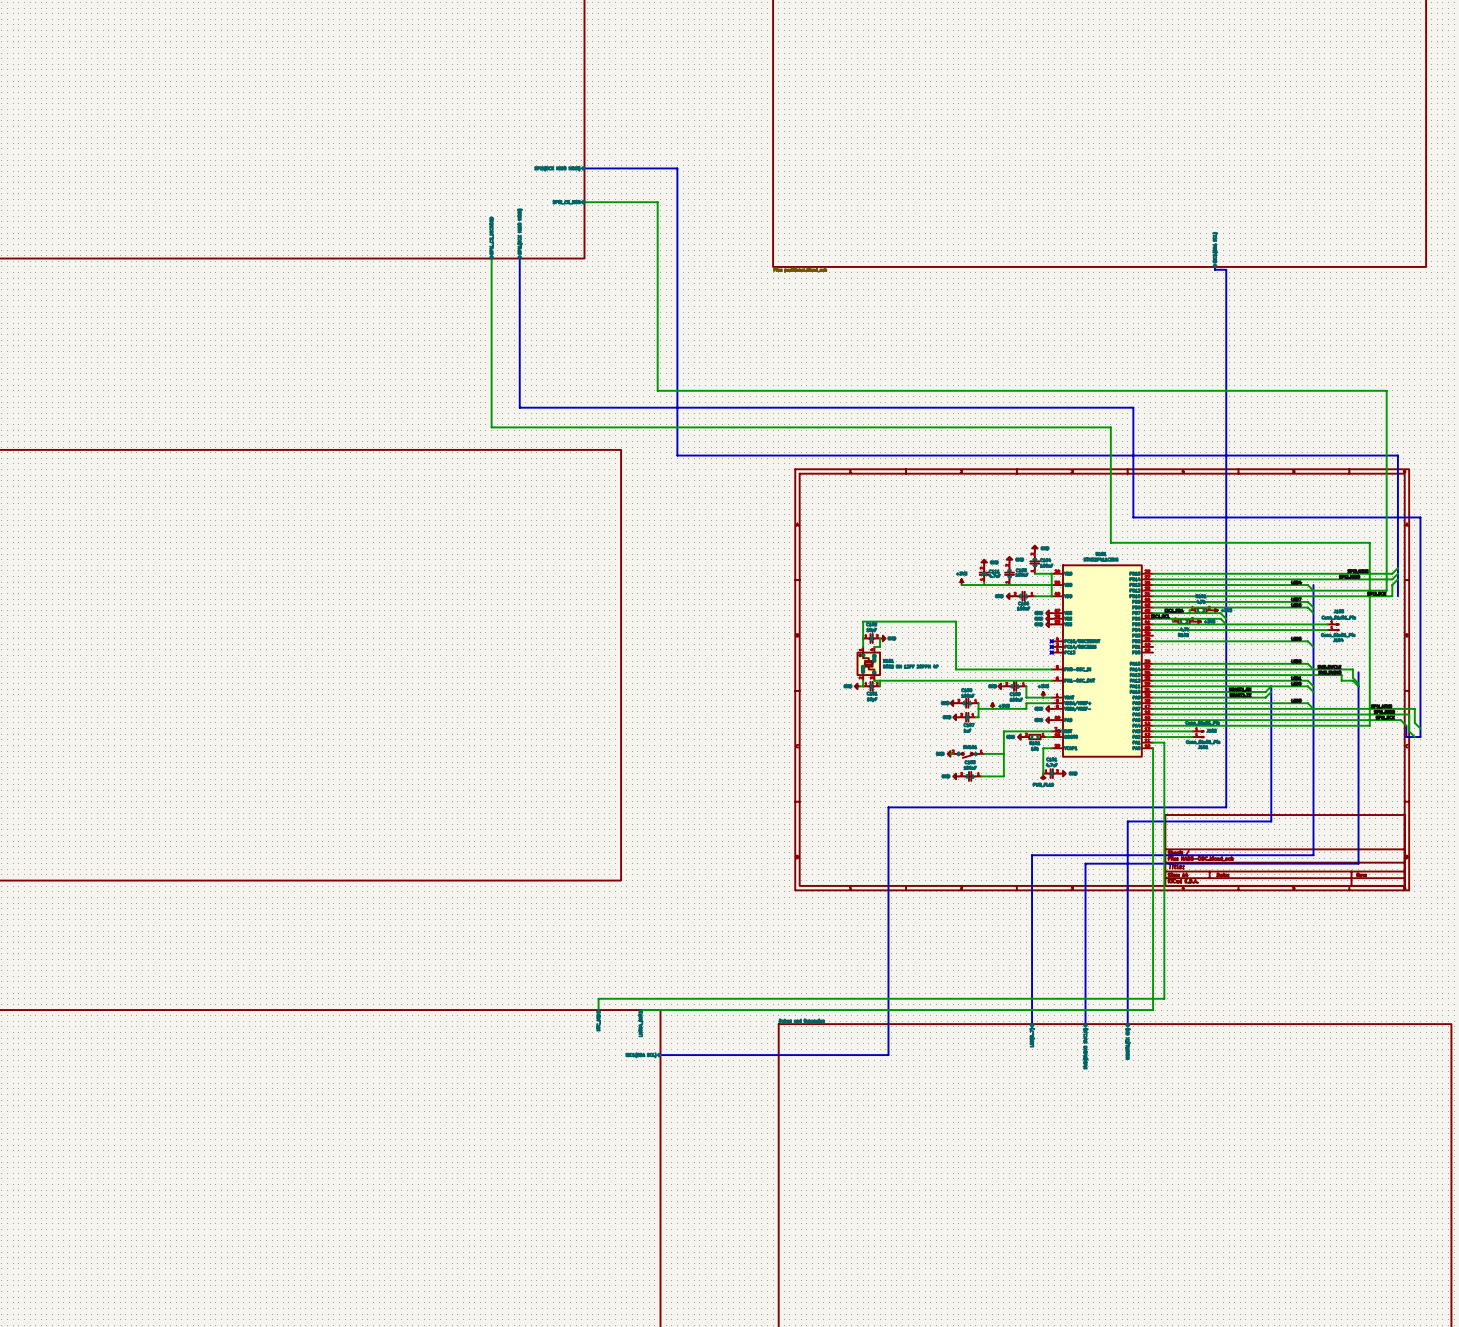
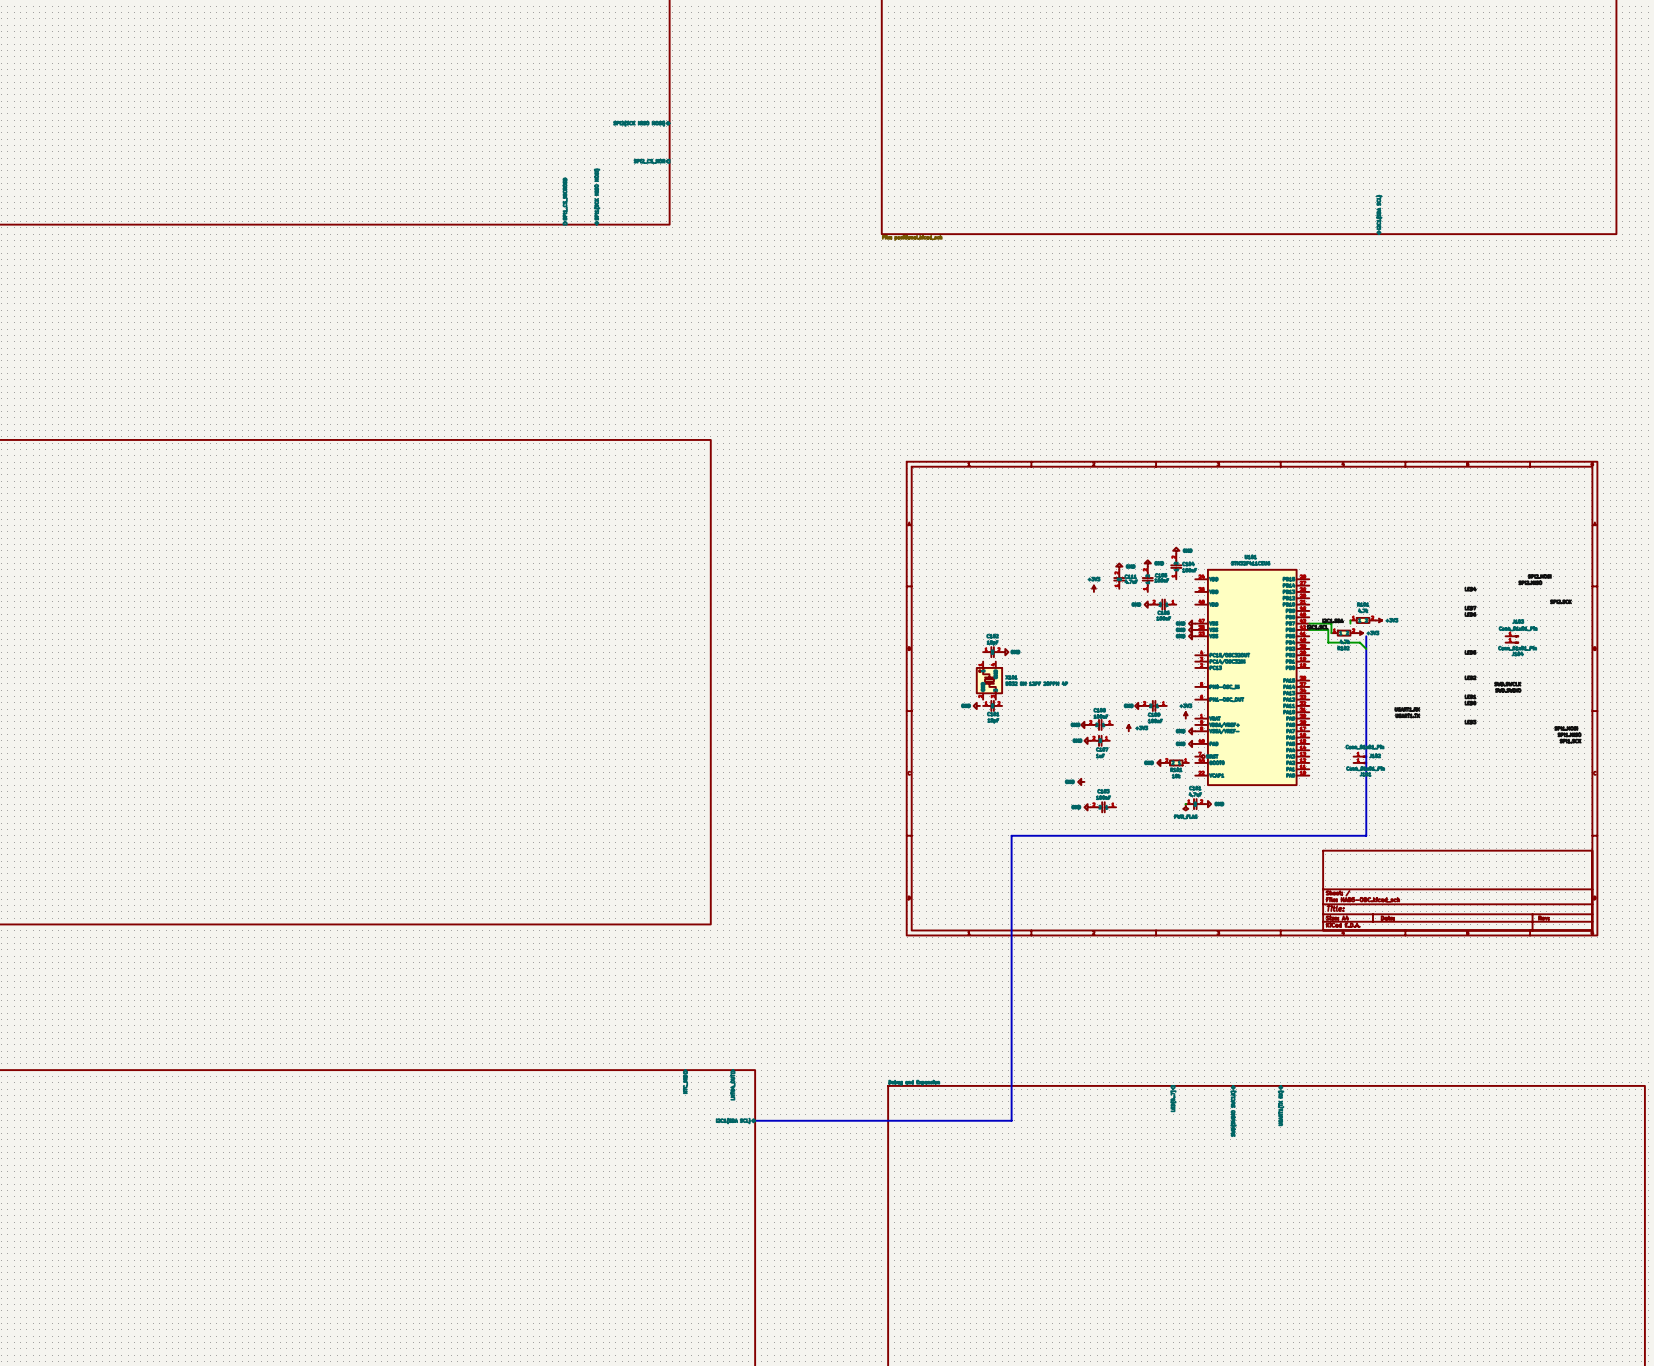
bus: (584, 168) (677, 168) (677, 455) (1397, 455) (1397, 596) -> none
wire: (584, 202) (657, 202) (657, 390) (1386, 390) (1386, 590) (1153, 590) -> none
wire: (491, 258) (491, 427) (1110, 427) (1110, 542) (1369, 542) (1369, 725) (1153, 725) -> none
bus: (519, 258) (519, 407) (1133, 407) (1133, 517) (1420, 517) (1420, 737) (1406, 737) (1406, 725) -> none
bus: (1214, 266) (1214, 269) (1226, 269) (1226, 807) (888, 807) -> (1366, 636) (1366, 835) (1011, 835) (1011, 842)
wire: (1397, 568) (1392, 573) (1153, 573) -> none
wire: (1034, 573) (1051, 573) (1051, 596) (1034, 596) -> none
wire: (1397, 573) (1392, 579) (1153, 579) -> none
wire: (1397, 579) (1392, 585) (1392, 596) (1153, 596) -> none
wire: (984, 582) (984, 585) -> none
wire: (961, 585) (1051, 585) -> none
wire: (1153, 585) (1307, 585) (1313, 590) -> none
bus: (1313, 585) (1313, 855) (1032, 855) (1032, 1024) -> none
wire: (1153, 601) (1307, 601) (1313, 607) -> none
wire: (1153, 607) (1307, 607) (1313, 613) -> none
wire: (1172, 613) (1220, 613) (1226, 618) -> (1331, 623) (1331, 629)
wire: (1169, 618) (1220, 618) (1226, 624) -> none
wire: (1153, 624) (1327, 624) -> none
wire: (1153, 630) (1169, 630) -> (1328, 629) (1328, 642)
wire: (1198, 630) (1327, 630) -> (1359, 642) (1366, 648)
wire: (880, 638) (880, 646) (874, 646) -> none
no-connect mark: (1051, 641) -> none
wire: (1153, 641) (1307, 641) (1313, 646) -> none
wire: (863, 646) (863, 621) (956, 621) (956, 669) (1051, 669) -> none
no-connect mark: (1051, 646) -> none
no-connect mark: (1051, 652) -> none
wire: (1153, 663) (1307, 663) (1313, 669) -> none
wire: (1153, 669) (1352, 669) (1352, 677) (1358, 683) -> none
bus: (1358, 672) (1358, 863) (1085, 863) (1085, 1024) -> none
wire: (1153, 675) (1341, 675) (1341, 680) (1352, 680) (1358, 686) -> none
wire: (863, 680) (863, 686) (860, 686) -> none
wire: (874, 680) (1051, 680) -> none
wire: (880, 680) (880, 686) -> none
wire: (1153, 680) (1307, 680) (1313, 686) -> none
wire: (1026, 686) (1026, 697) (1051, 697) -> none
wire: (1153, 686) (1307, 686) (1313, 691) -> none
wire: (1271, 686) (1265, 691) (1153, 691) -> none
bus: (1271, 686) (1271, 821) (1127, 821) (1127, 1024) -> none
wire: (1271, 691) (1265, 697) (1153, 697) -> none
wire: (978, 703) (978, 717) (975, 717) -> none
wire: (1051, 703) (1026, 703) (1026, 708) (978, 708) -> none
wire: (1153, 703) (1307, 703) (1313, 708) -> none
wire: (1153, 708) (1414, 708) (1414, 722) (1420, 728) -> none
wire: (1153, 714) (1409, 714) (1409, 731) (1414, 737) -> none
wire: (1153, 720) (1400, 720) (1406, 725) -> none
wire: (1051, 731) (1003, 731) (1003, 776) (981, 776) -> none
wire: (1153, 731) (1192, 731) -> none
wire: (1046, 737) (1051, 737) -> none
wire: (1153, 737) (1192, 737) -> none
wire: (1153, 742) (1164, 742) (1164, 998) (598, 998) (598, 1010) -> none
wire: (1051, 748) (1043, 748) (1043, 773) -> none
wire: (1153, 748) (1153, 1010) (640, 1010) -> none
wire: (984, 753) (1003, 753) -> none
part: (967, 755) -> none

